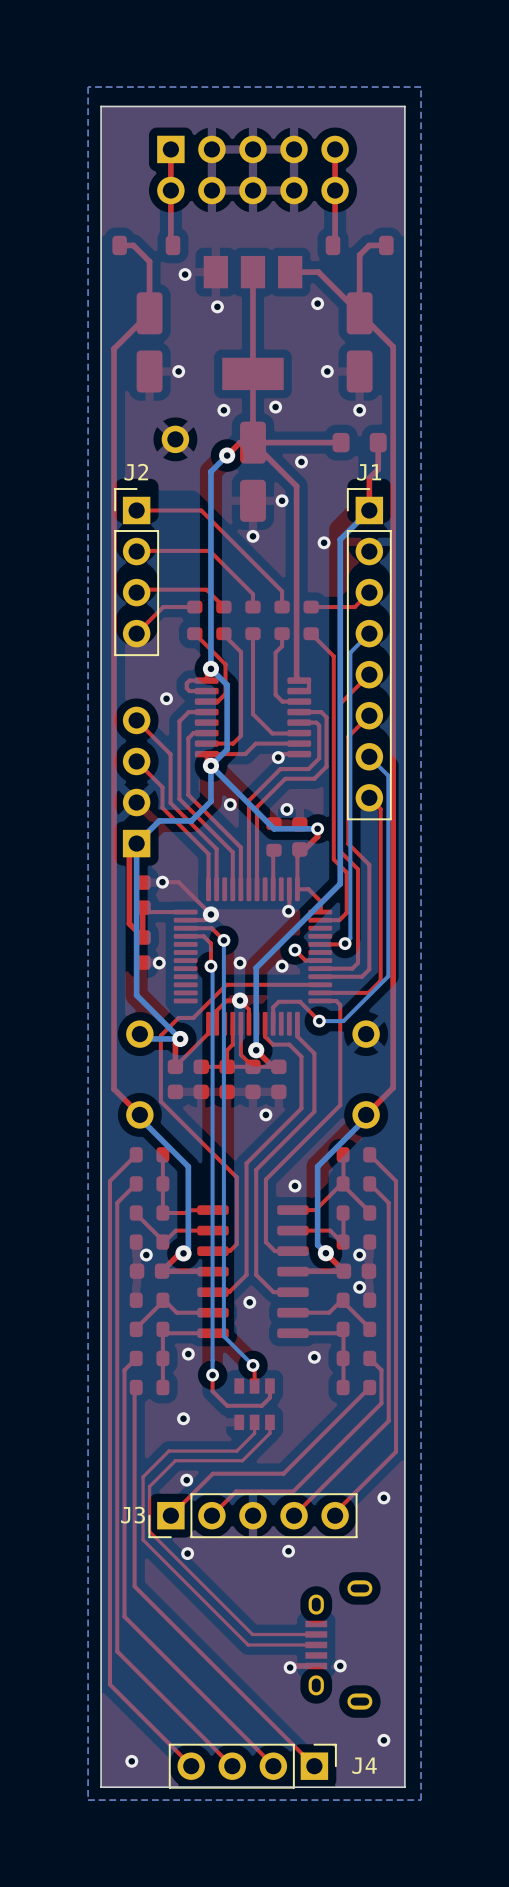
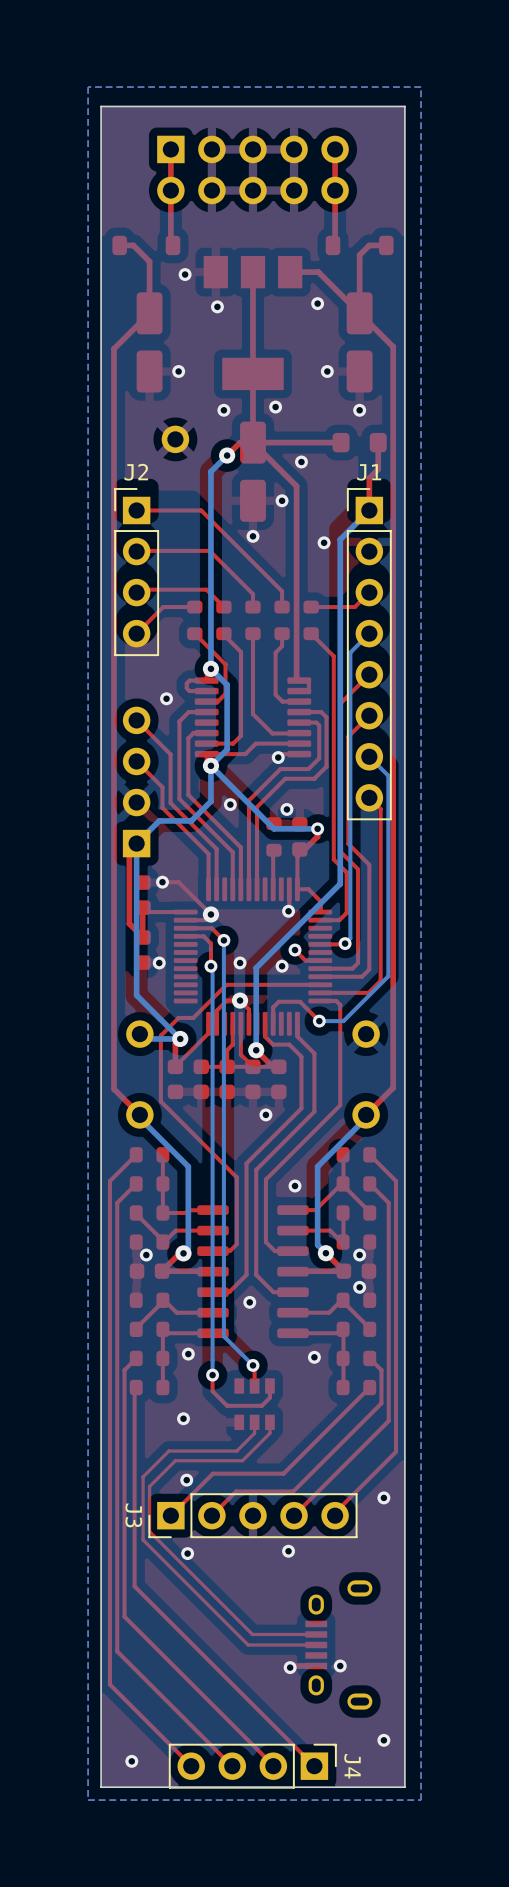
J3 name rotation: 0° (132, 1515) -> 90° clockwise (133, 1515)
J4 name rotation: 0° (364, 1765) -> 90° clockwise (352, 1766)

